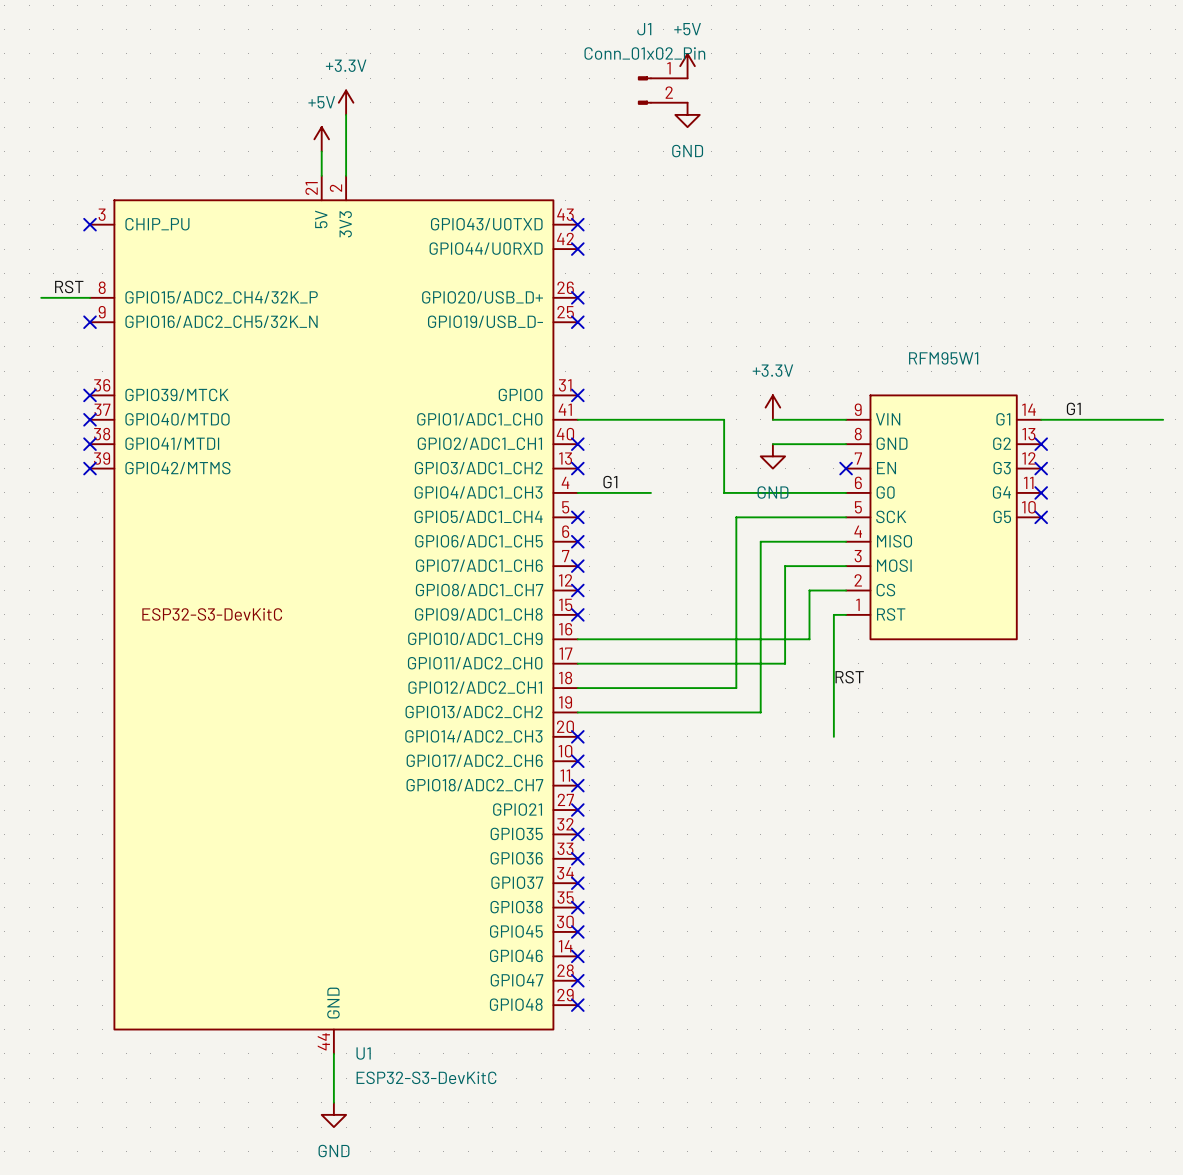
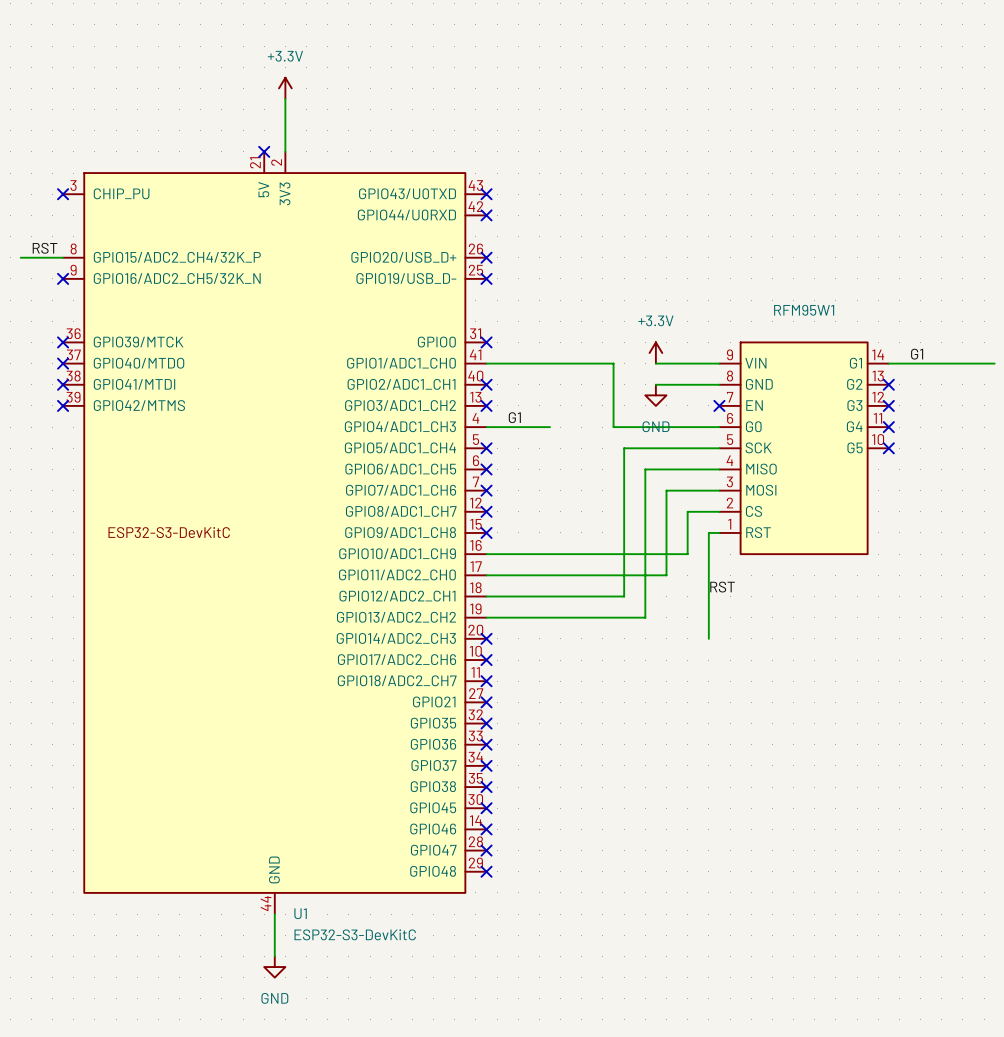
power symbol: +5V (687, 66) -> none
J1: Conn_01x02_Pin (662, 90) -> none
power symbol: GND (687, 114) -> none
power symbol: +5V (321, 139) -> none
wire: (321, 151) (321, 175) -> none
no-connect mark: none -> (264, 151)

